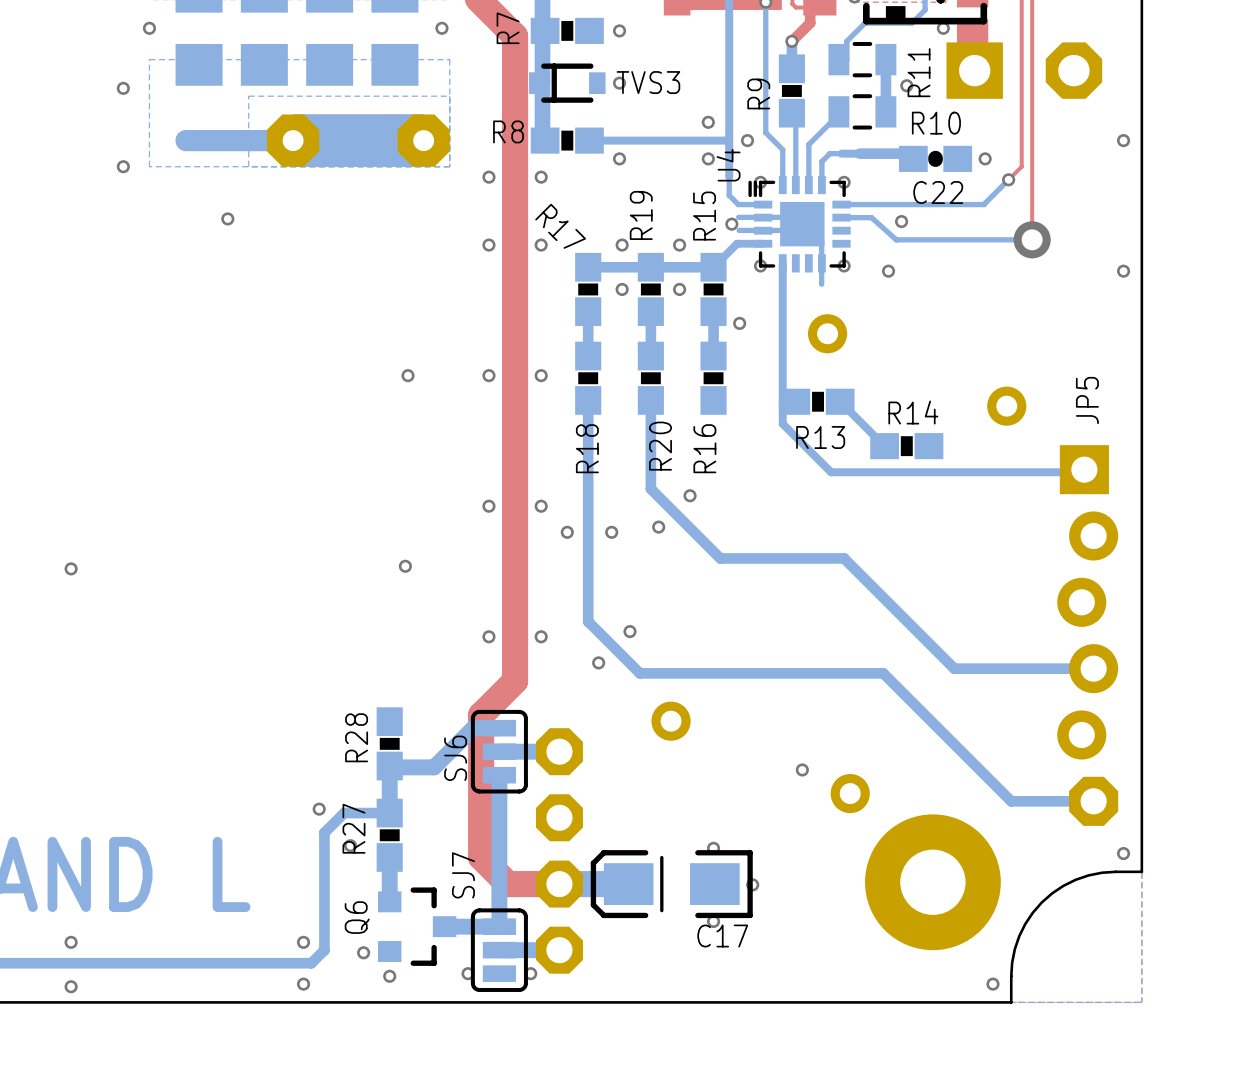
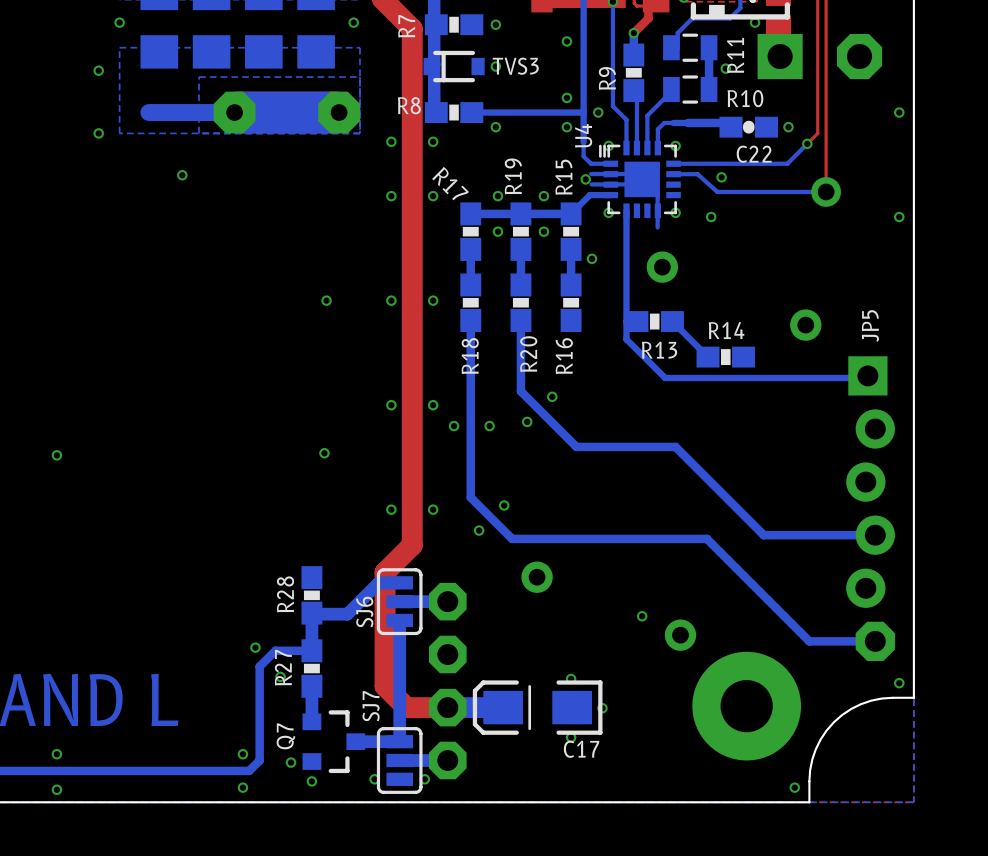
via: none -> (566, 41)
Q6 name: Q6 (357, 917) -> Q7 (285, 736)

